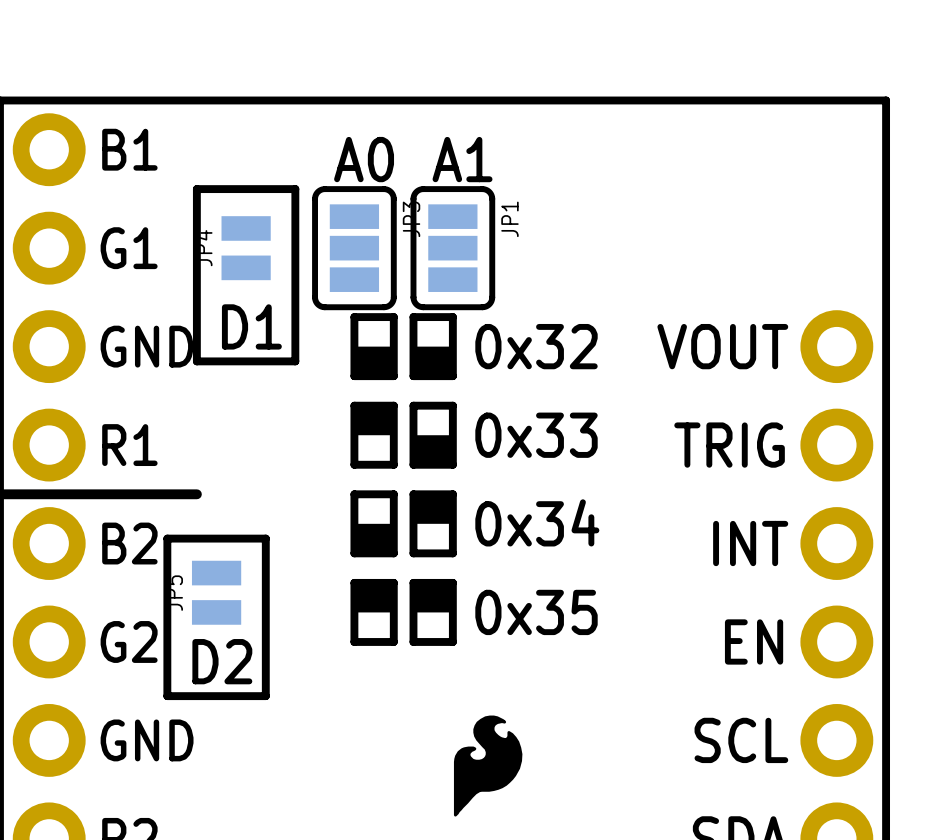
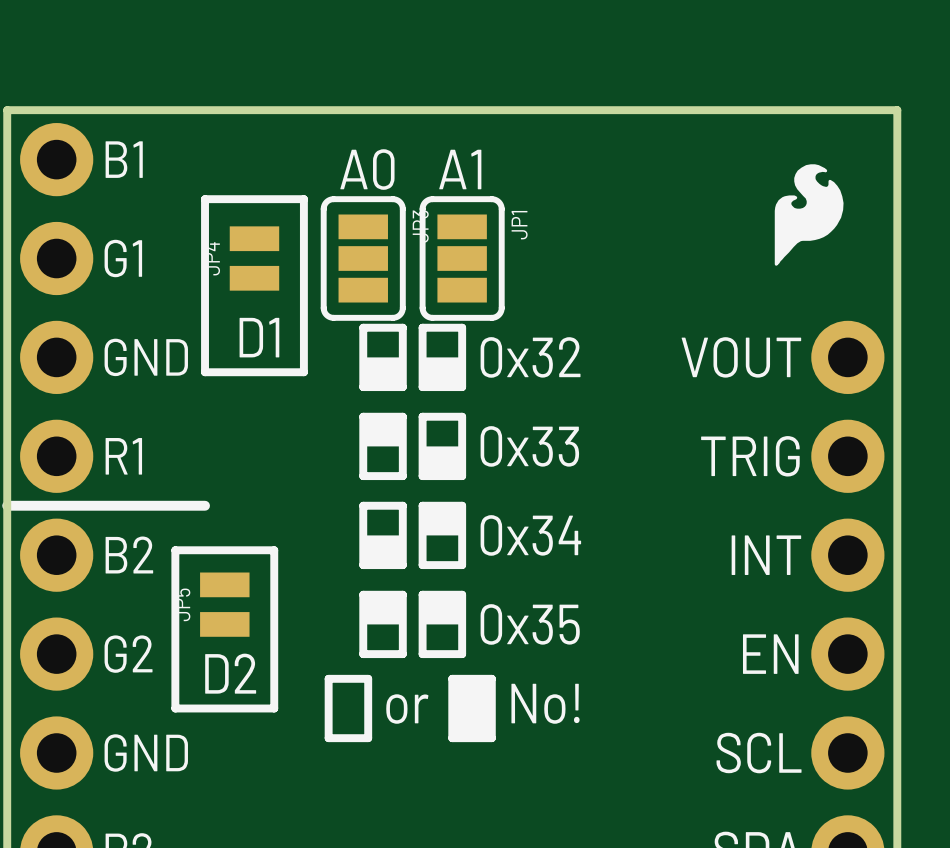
line: none -> (368, 678) (328, 678) (328, 738) (368, 738) (368, 678)
drawing: none -> [452, 678, 492, 739]
line: none -> (491, 678) (452, 678) (452, 738) (491, 738) (491, 678)
text: none -> No! (545, 703)
text: none -> or (407, 709)
drawing position: (488, 766) -> (809, 215)

